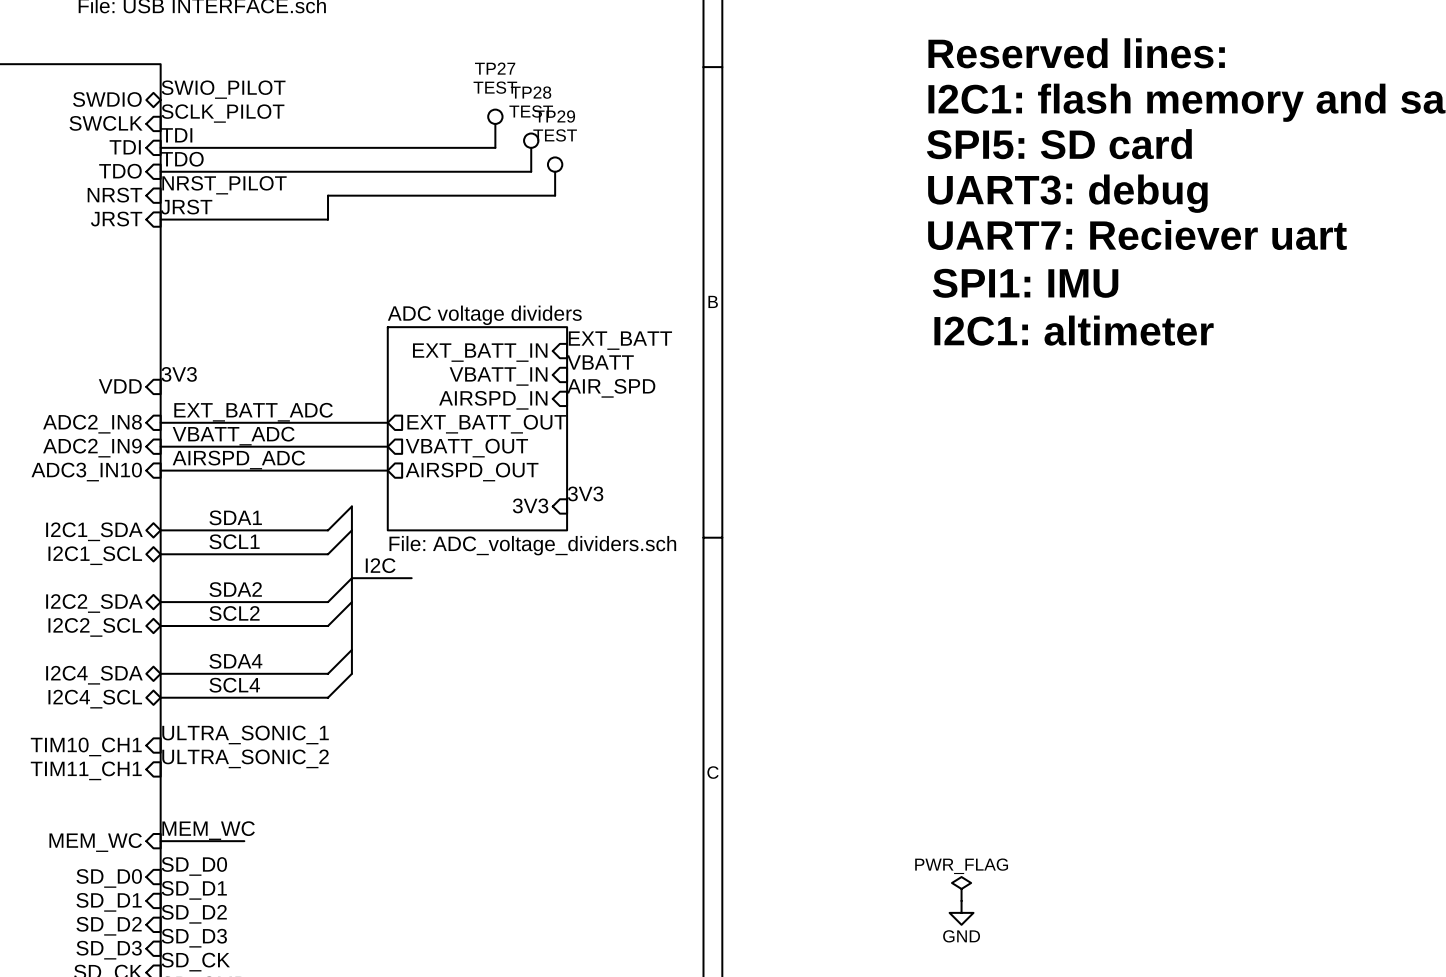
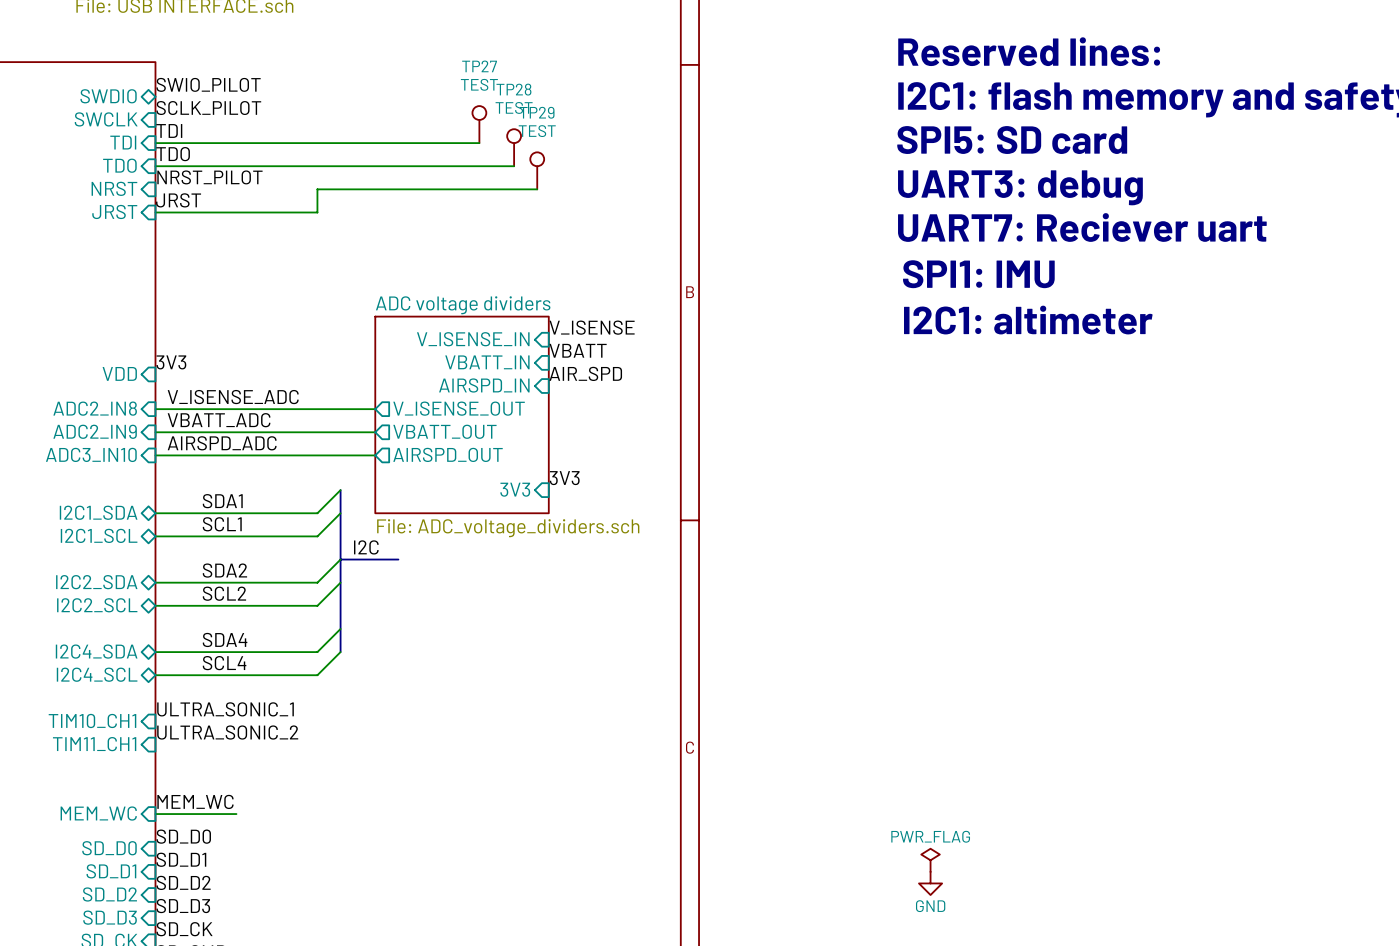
label: EXT_BATT (620, 340) -> V_ISENSE (592, 327)
sheet pin: EXT_BATT_IN (480, 352) -> V_ISENSE_IN (473, 339)
label: EXT_BATT_ADC (253, 412) -> V_ISENSE_ADC (233, 397)
sheet pin: EXT_BATT_OUT (486, 424) -> V_ISENSE_OUT (459, 408)

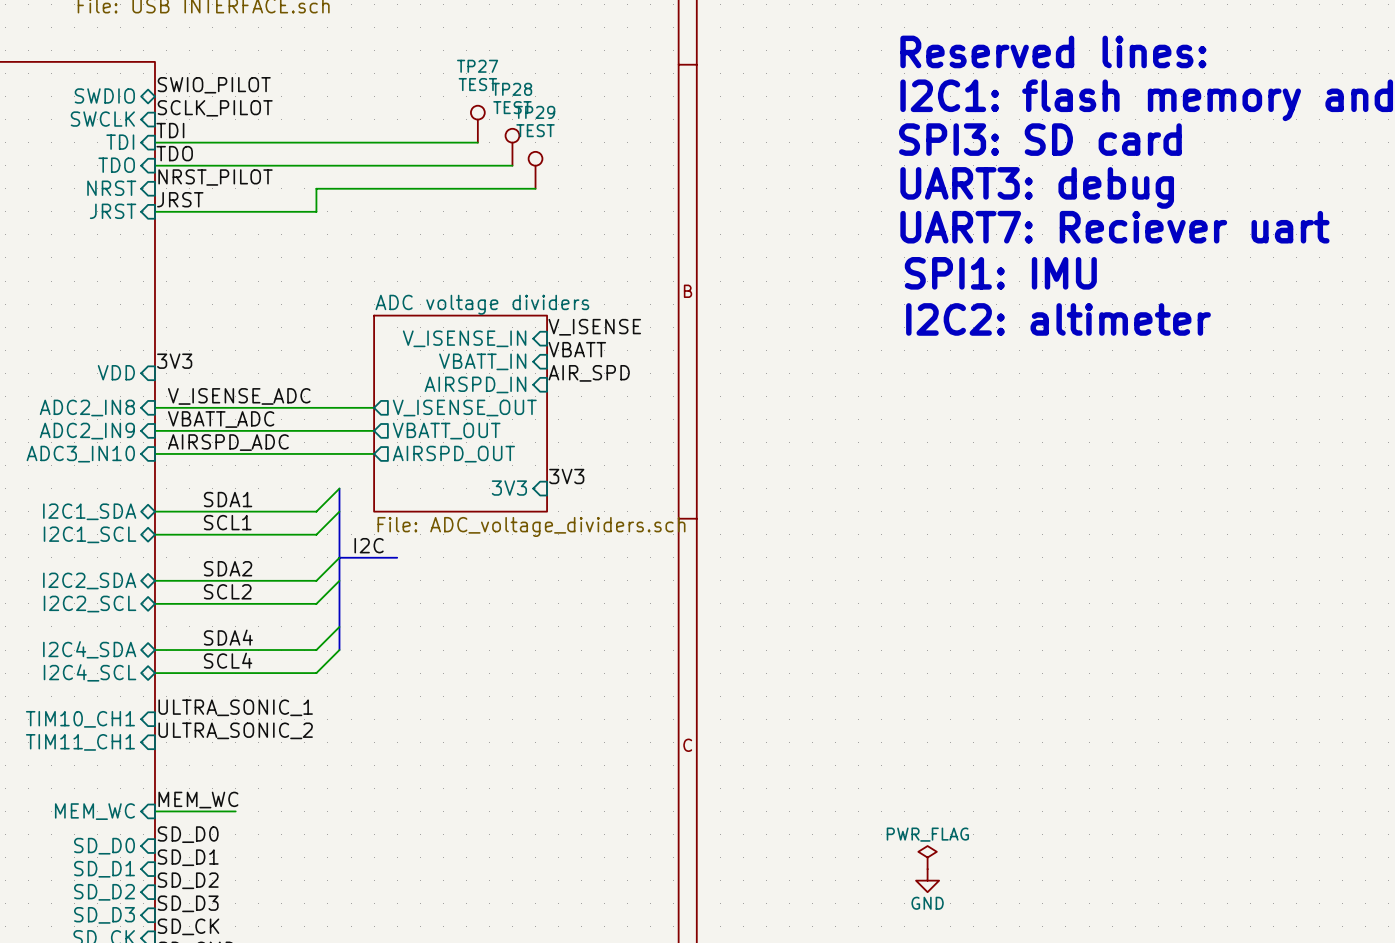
text: SPI5: SD card (1012, 140) -> SPI3: SD card (1040, 139)
text: I2C1: altimeter (1028, 320) -> I2C2: altimeter (1058, 319)

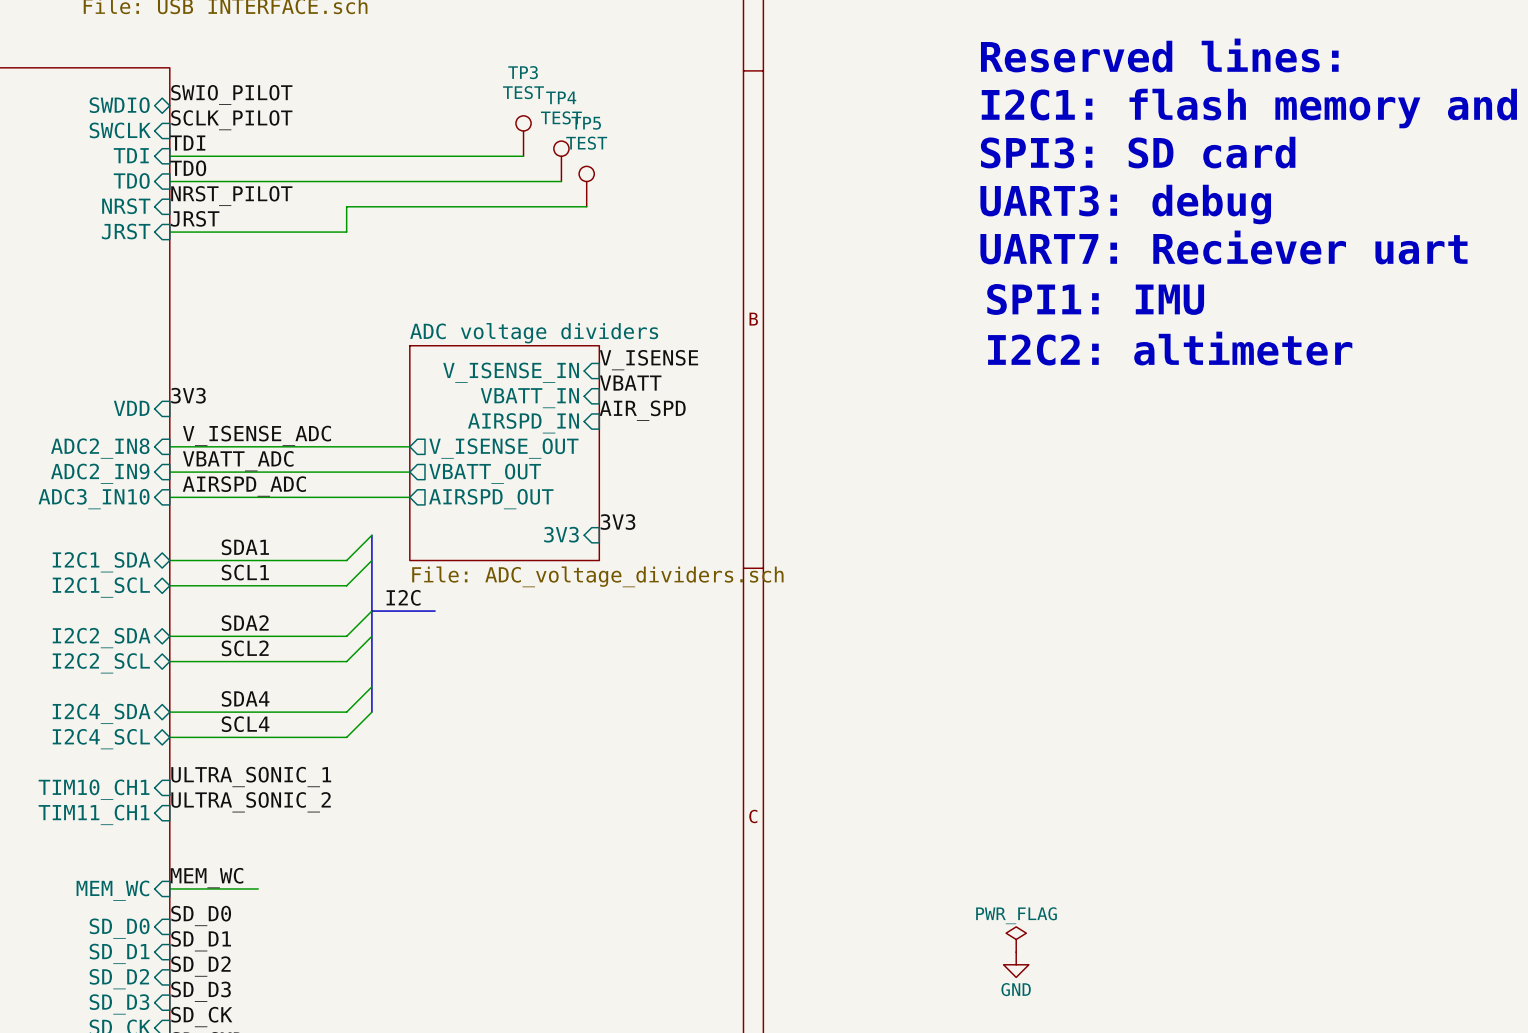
TP27 name: TP27 (477, 66) -> TP3 (523, 72)
TP28 name: TP28 (511, 89) -> TP4 (561, 97)
TP29 name: TP29 (534, 112) -> TP5 (586, 123)

